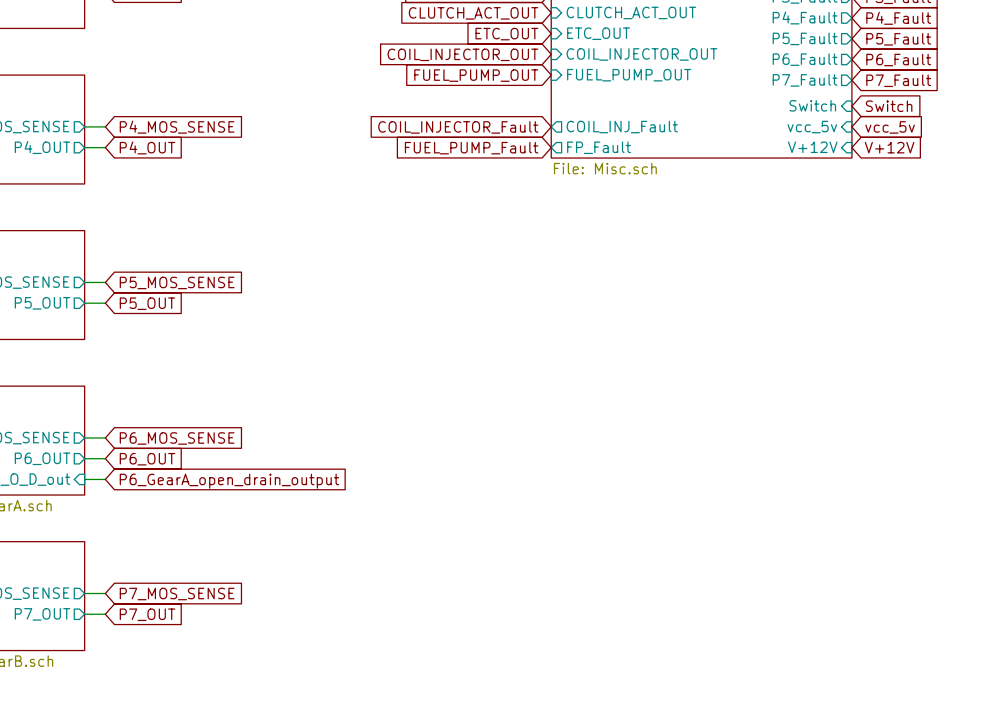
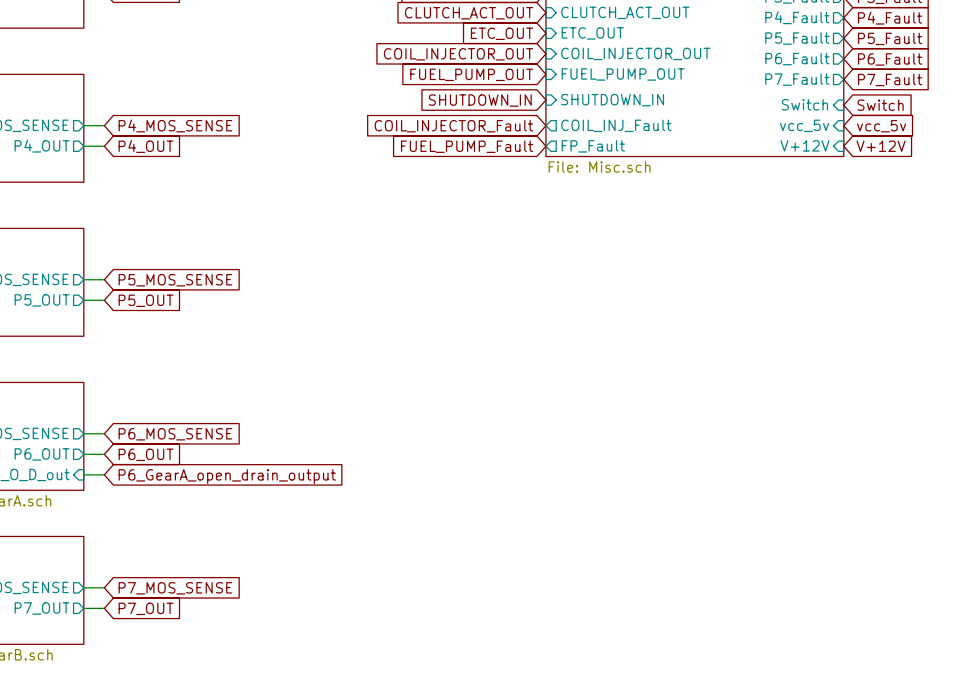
global label: none -> SHUTDOWN_IN (480, 100)
sheet pin: none -> SHUTDOWN_IN (612, 100)

